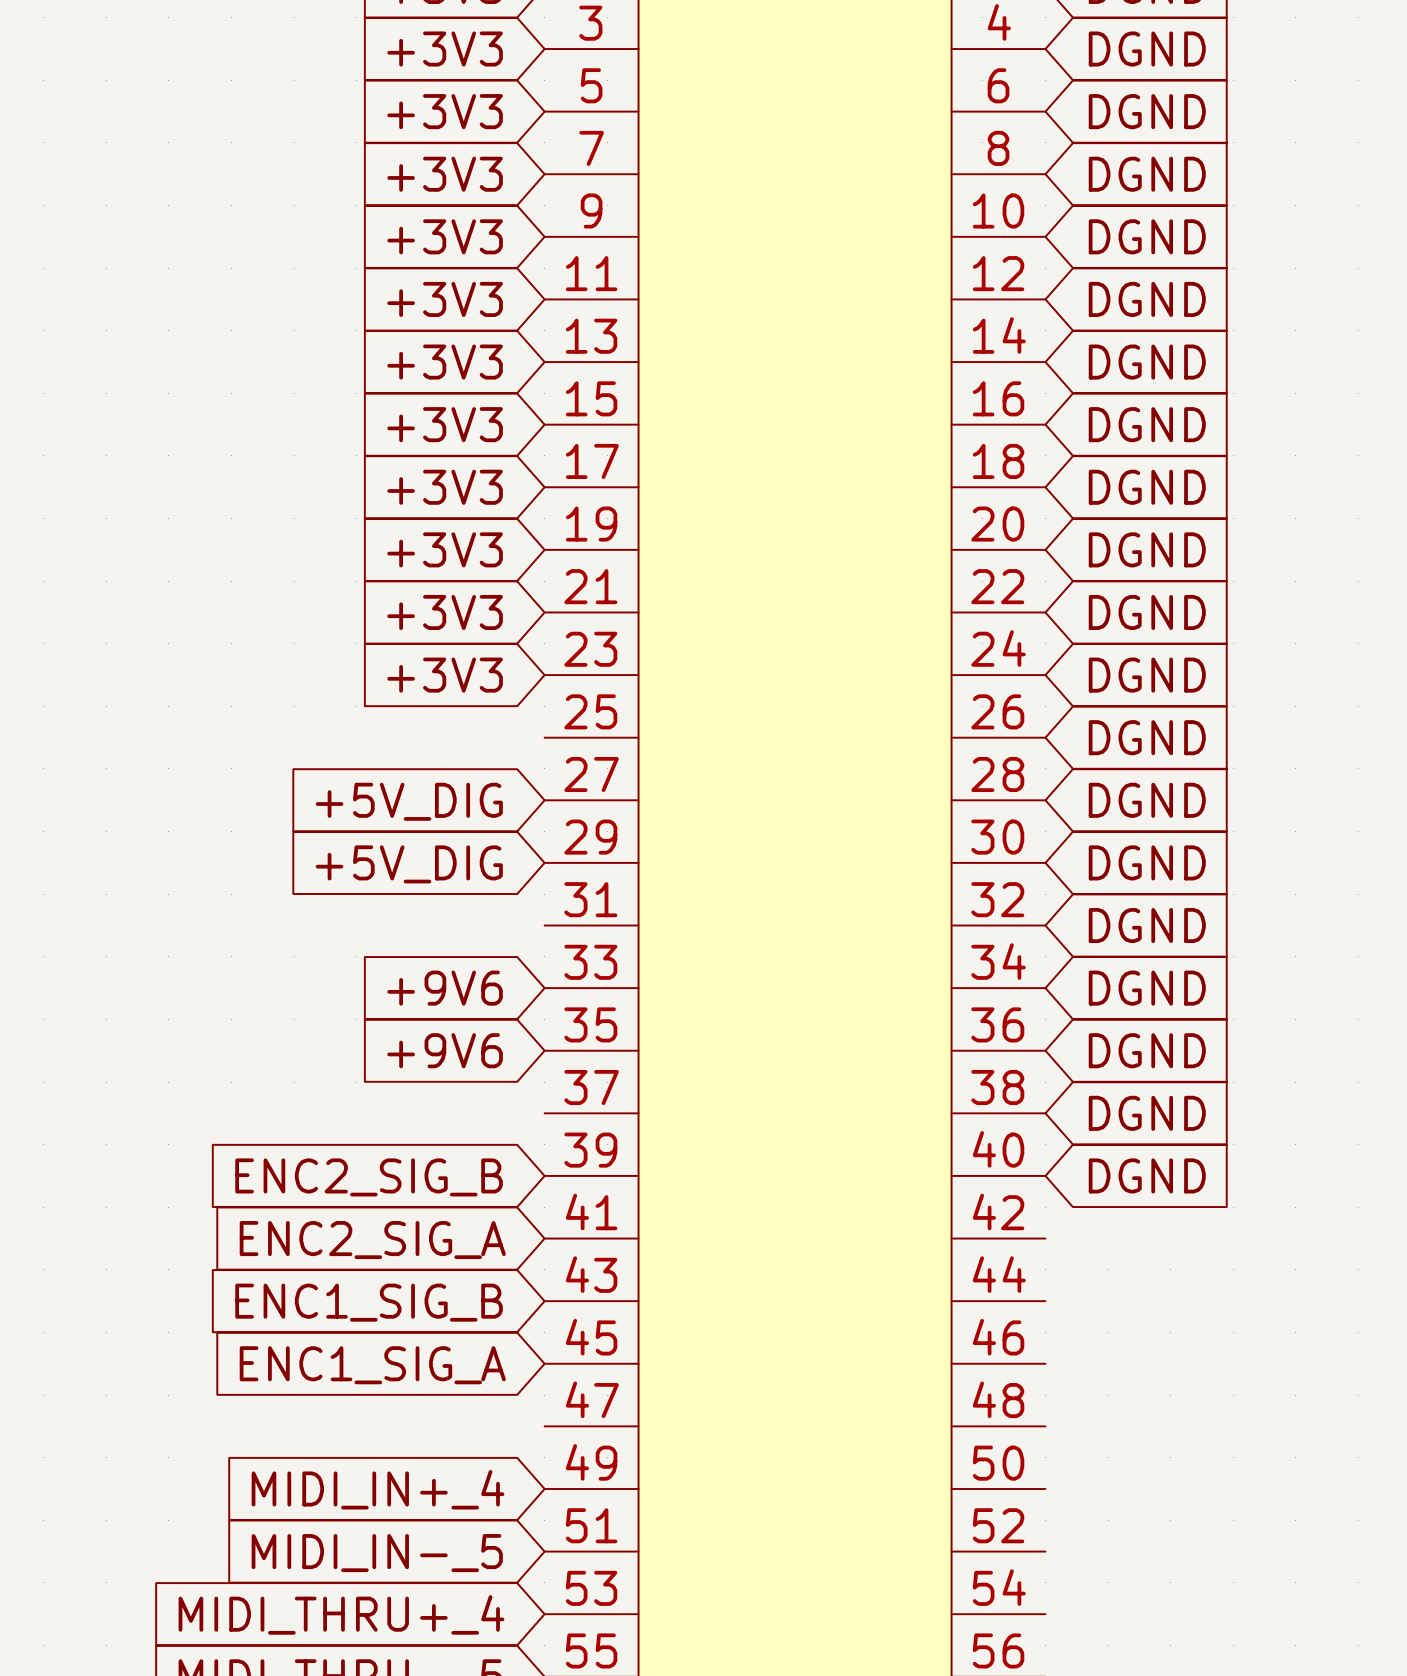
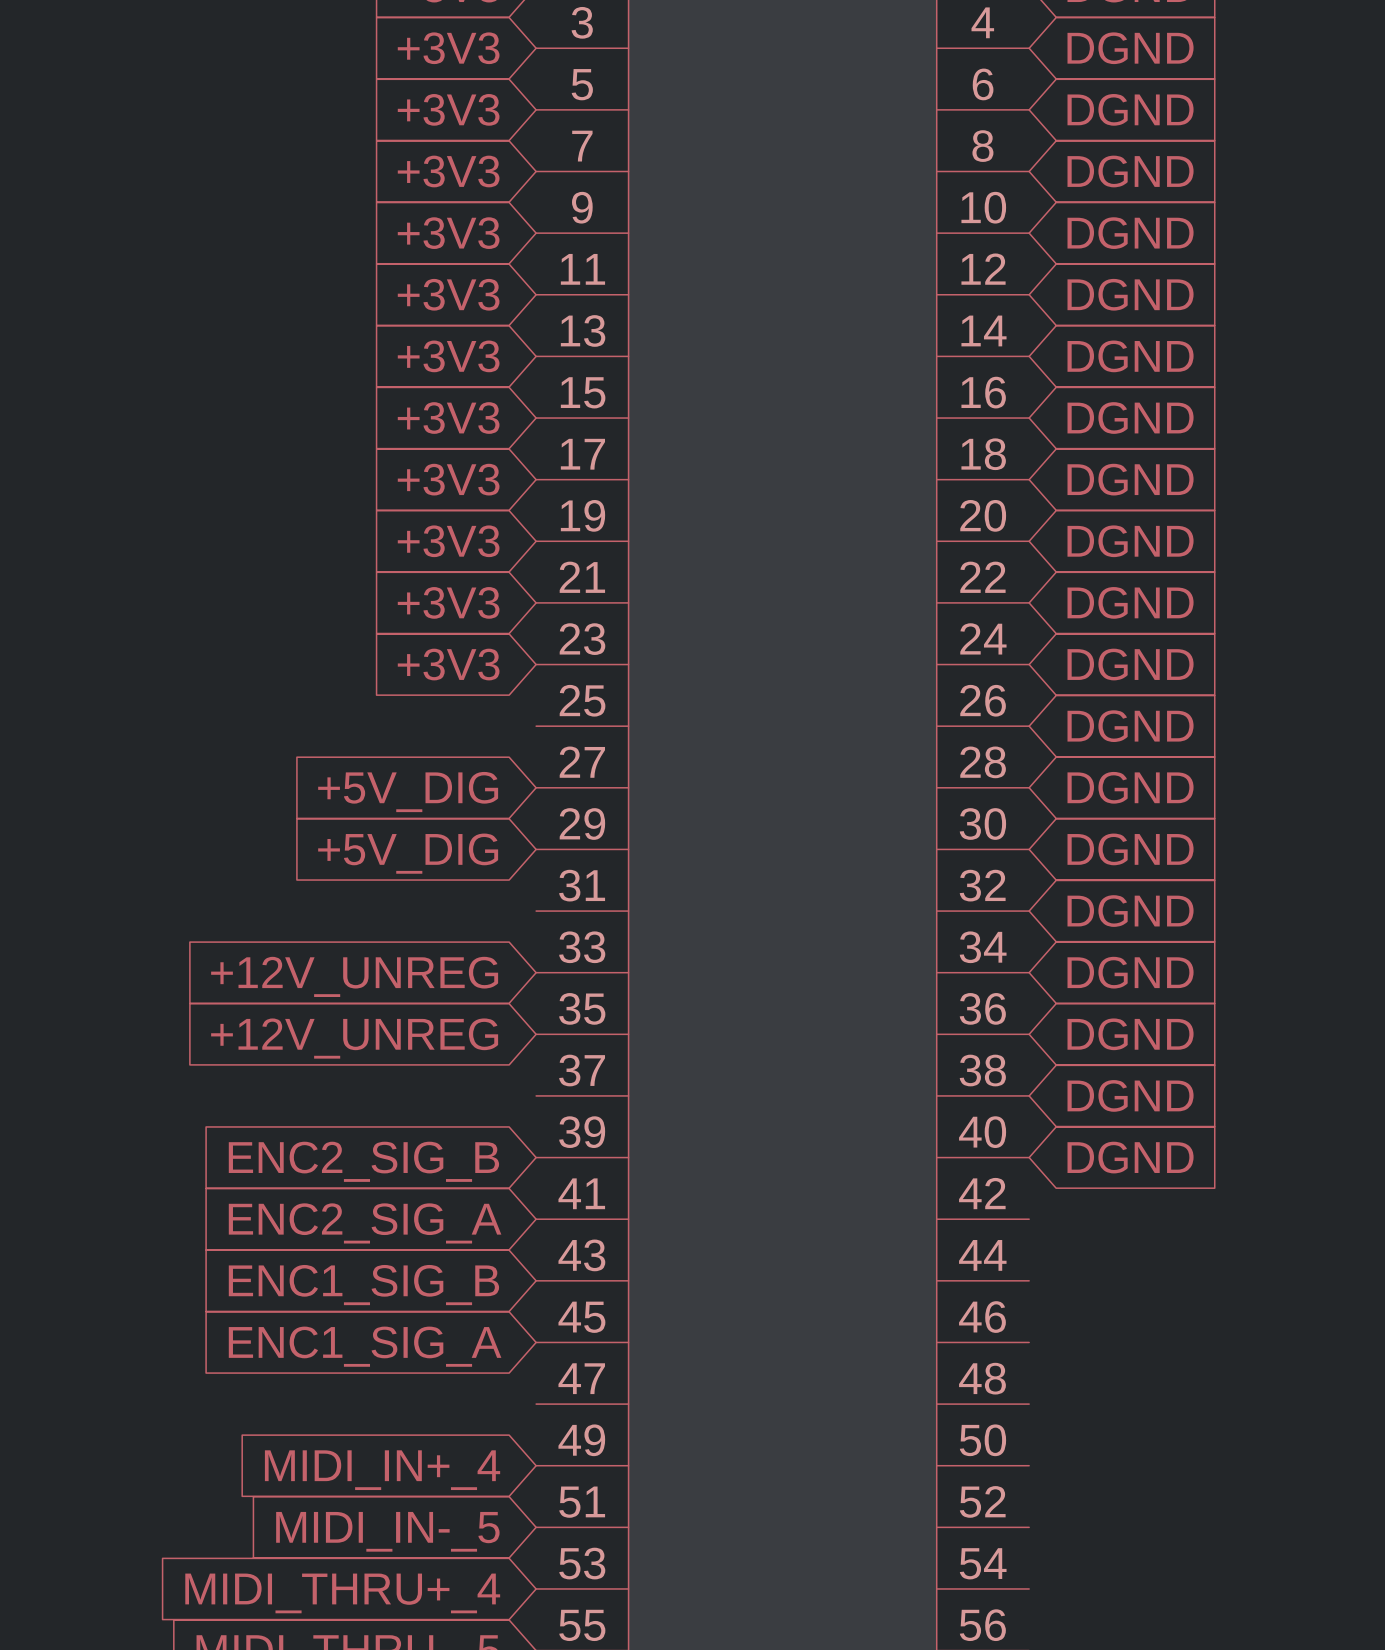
global label: +9V6 (445, 988) -> +12V_UNREG (354, 976)
global label: +9V6 (445, 1050) -> +12V_UNREG (354, 1038)

